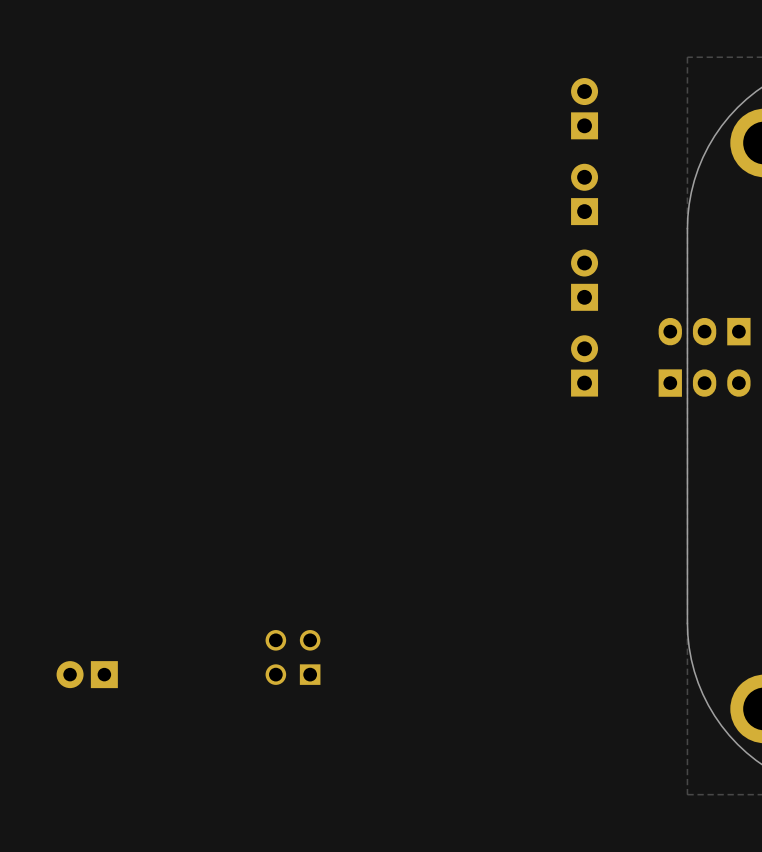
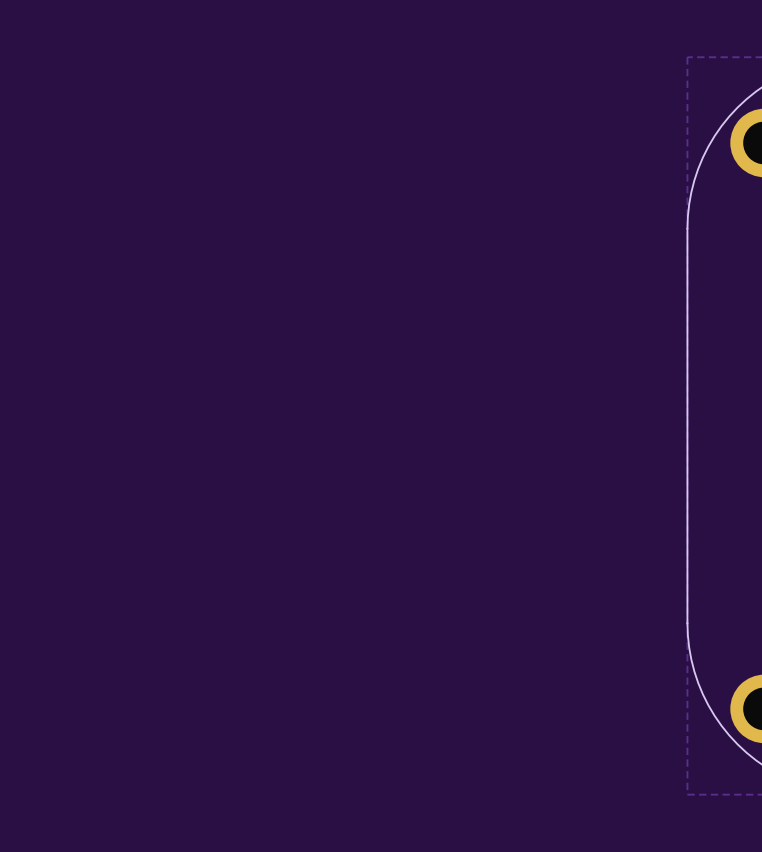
part: (584, 108) -> none
part: (584, 194) -> none
part: (584, 280) -> none
part: (704, 331) -> none
part: (584, 365) -> none
part: (704, 383) -> none
part: (293, 657) -> none
part: (87, 674) -> none

